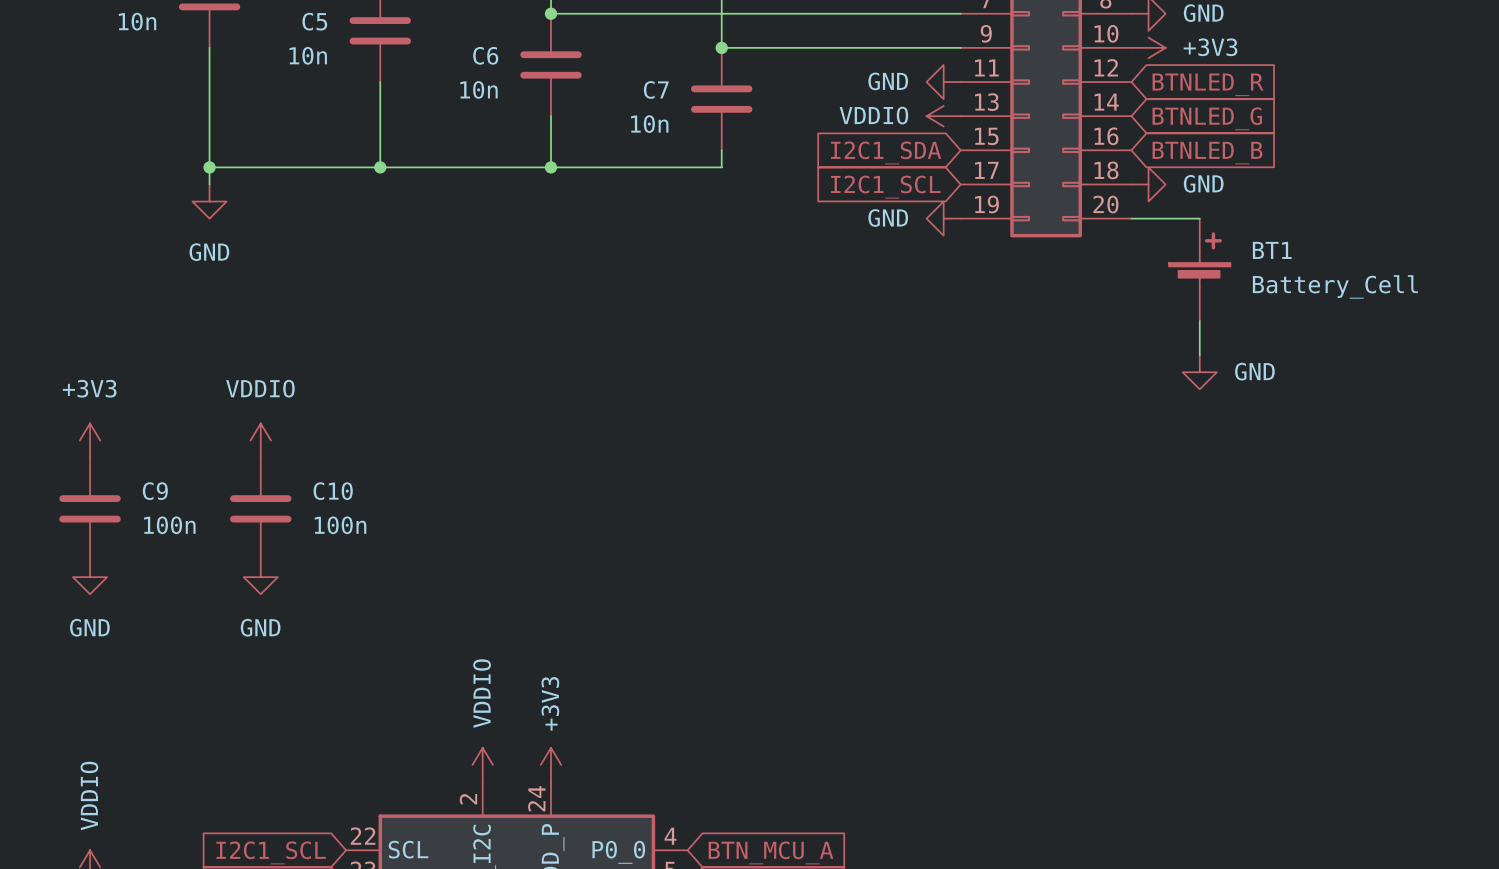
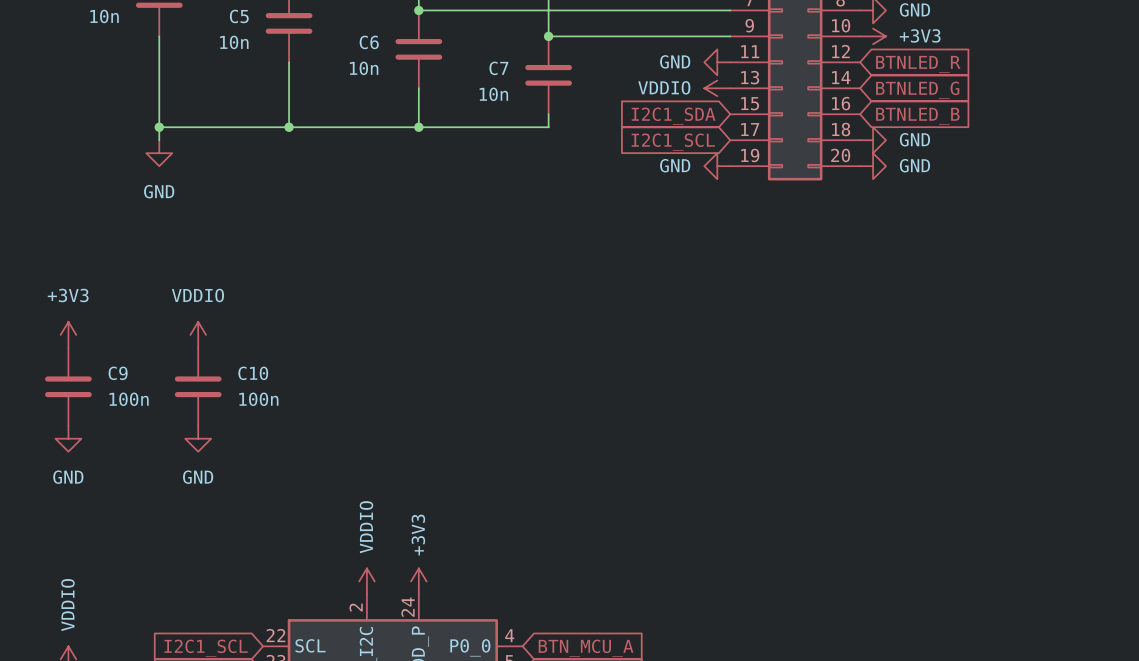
wire: (1131, 218) (1199, 218) -> none
BT1: Battery_Cell (1199, 269) -> none
wire: (1199, 321) (1199, 355) -> none
power symbol rotation: 0° (1199, 372) -> 90° counterclockwise (873, 166)
power symbol position: GND (1199, 372) -> GND (873, 166)

